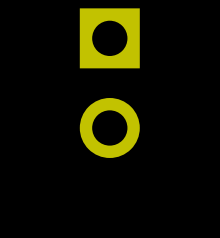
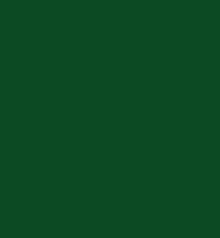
part: (109, 83) -> none

